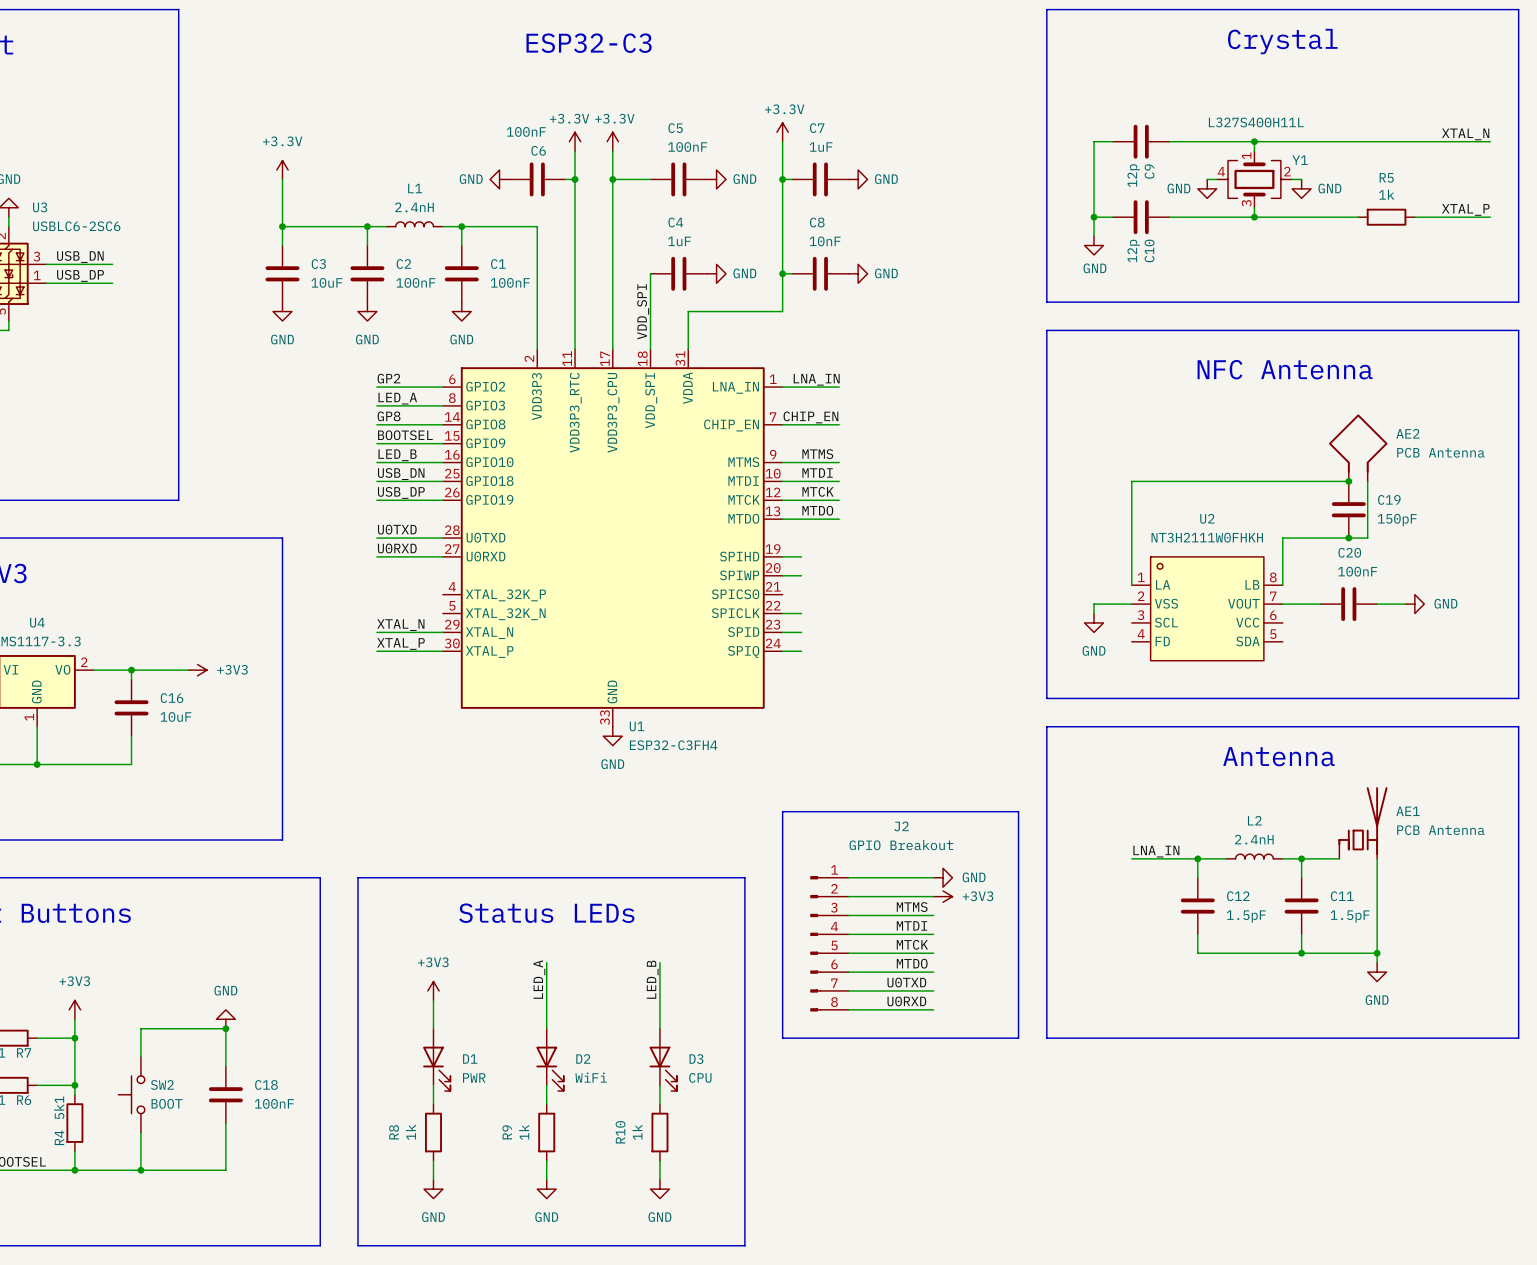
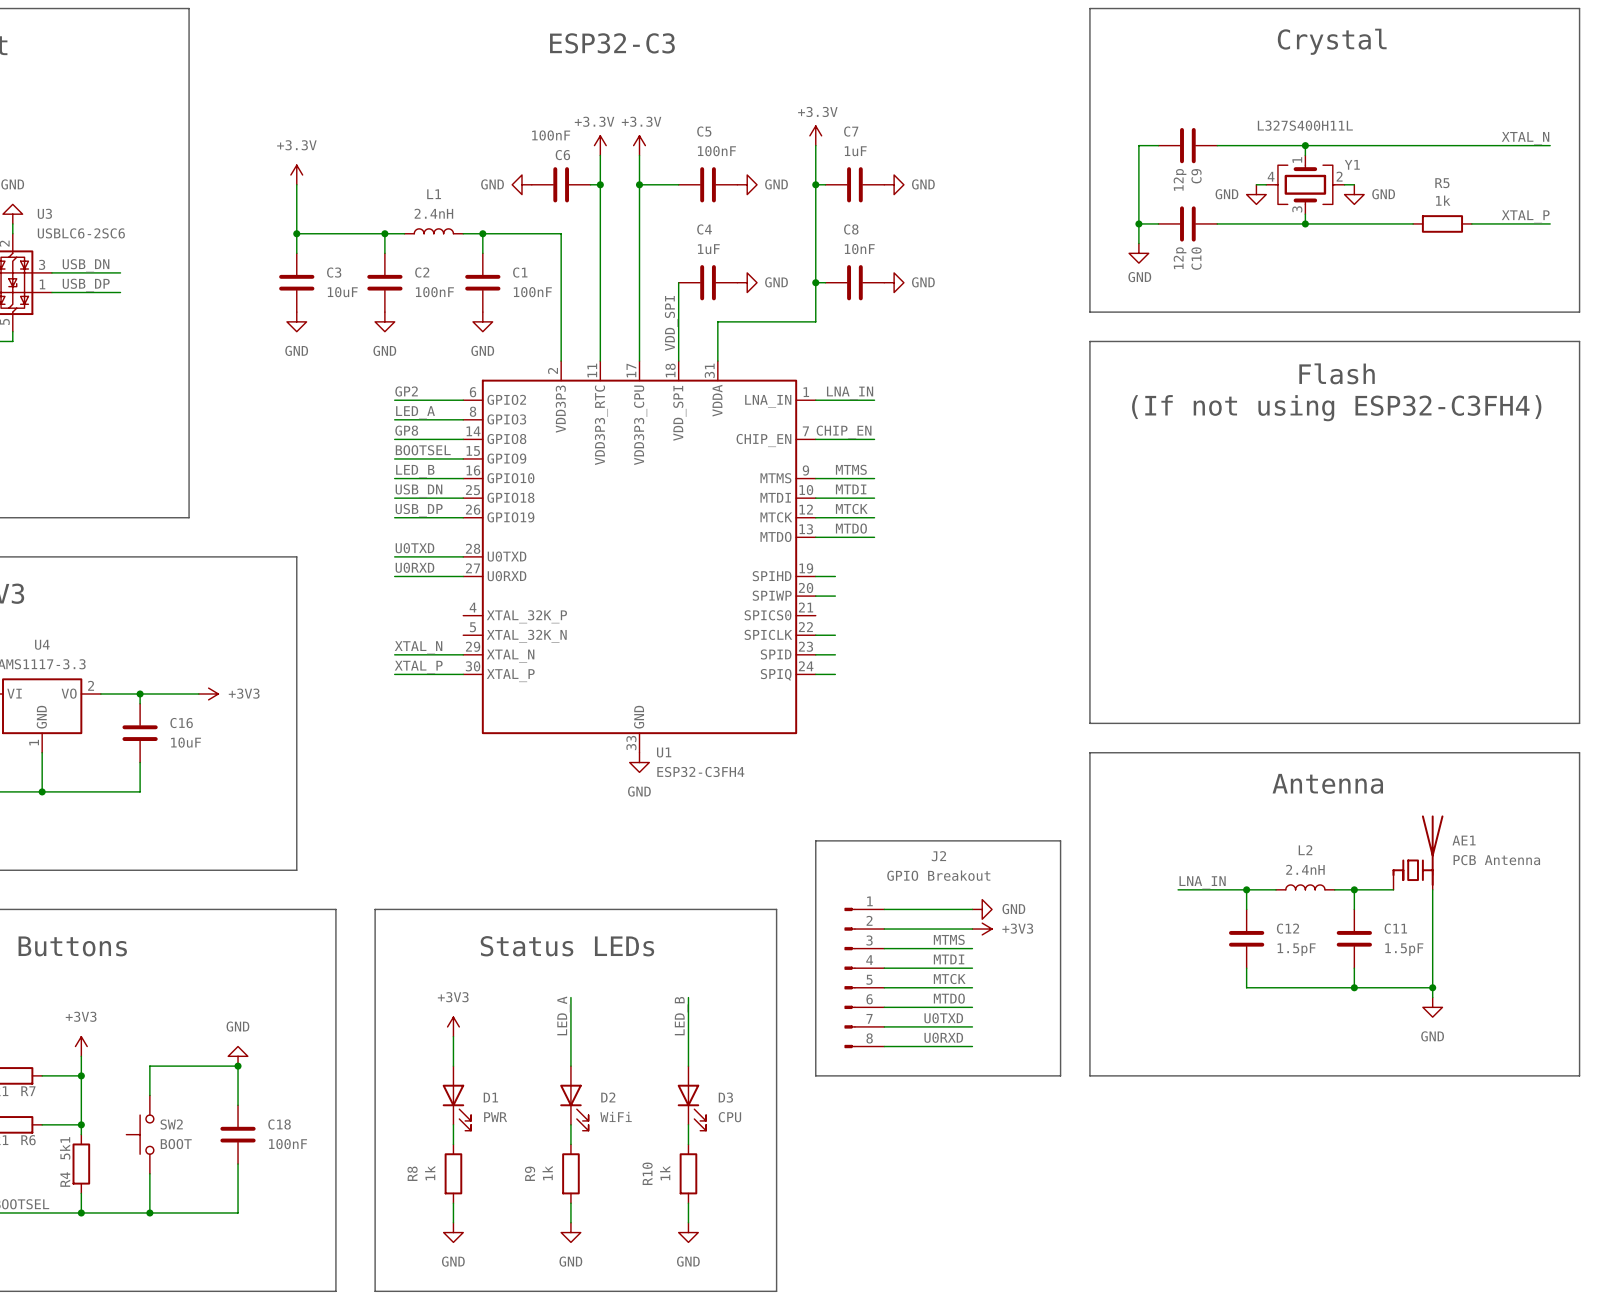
text: none -> Flash (1337, 373)
text: NFC Antenna (1285, 369) -> none
text: none -> (If not using ESP32-C3FH4) (1336, 408)
AE2: PCB Antenna (1358, 447) -> none
wire: (1348, 481) (1131, 481) (1131, 585) -> none
junction: (1348, 481) -> none
wire: (1367, 481) (1367, 538) (1282, 538) (1282, 585) -> none
C19: 150pF (1348, 509) -> none
junction: (1348, 538) -> none
wire: (1131, 604) (1094, 604) (1094, 613) -> none
wire: (1282, 604) (1320, 604) -> none
C20: 100nF (1348, 604) -> none
wire: (1377, 604) (1405, 604) -> none
power symbol: GND (1414, 604) -> none
U2: NT3H2111W0FHKH (1207, 608) -> none
power symbol: GND (1094, 622) -> none

